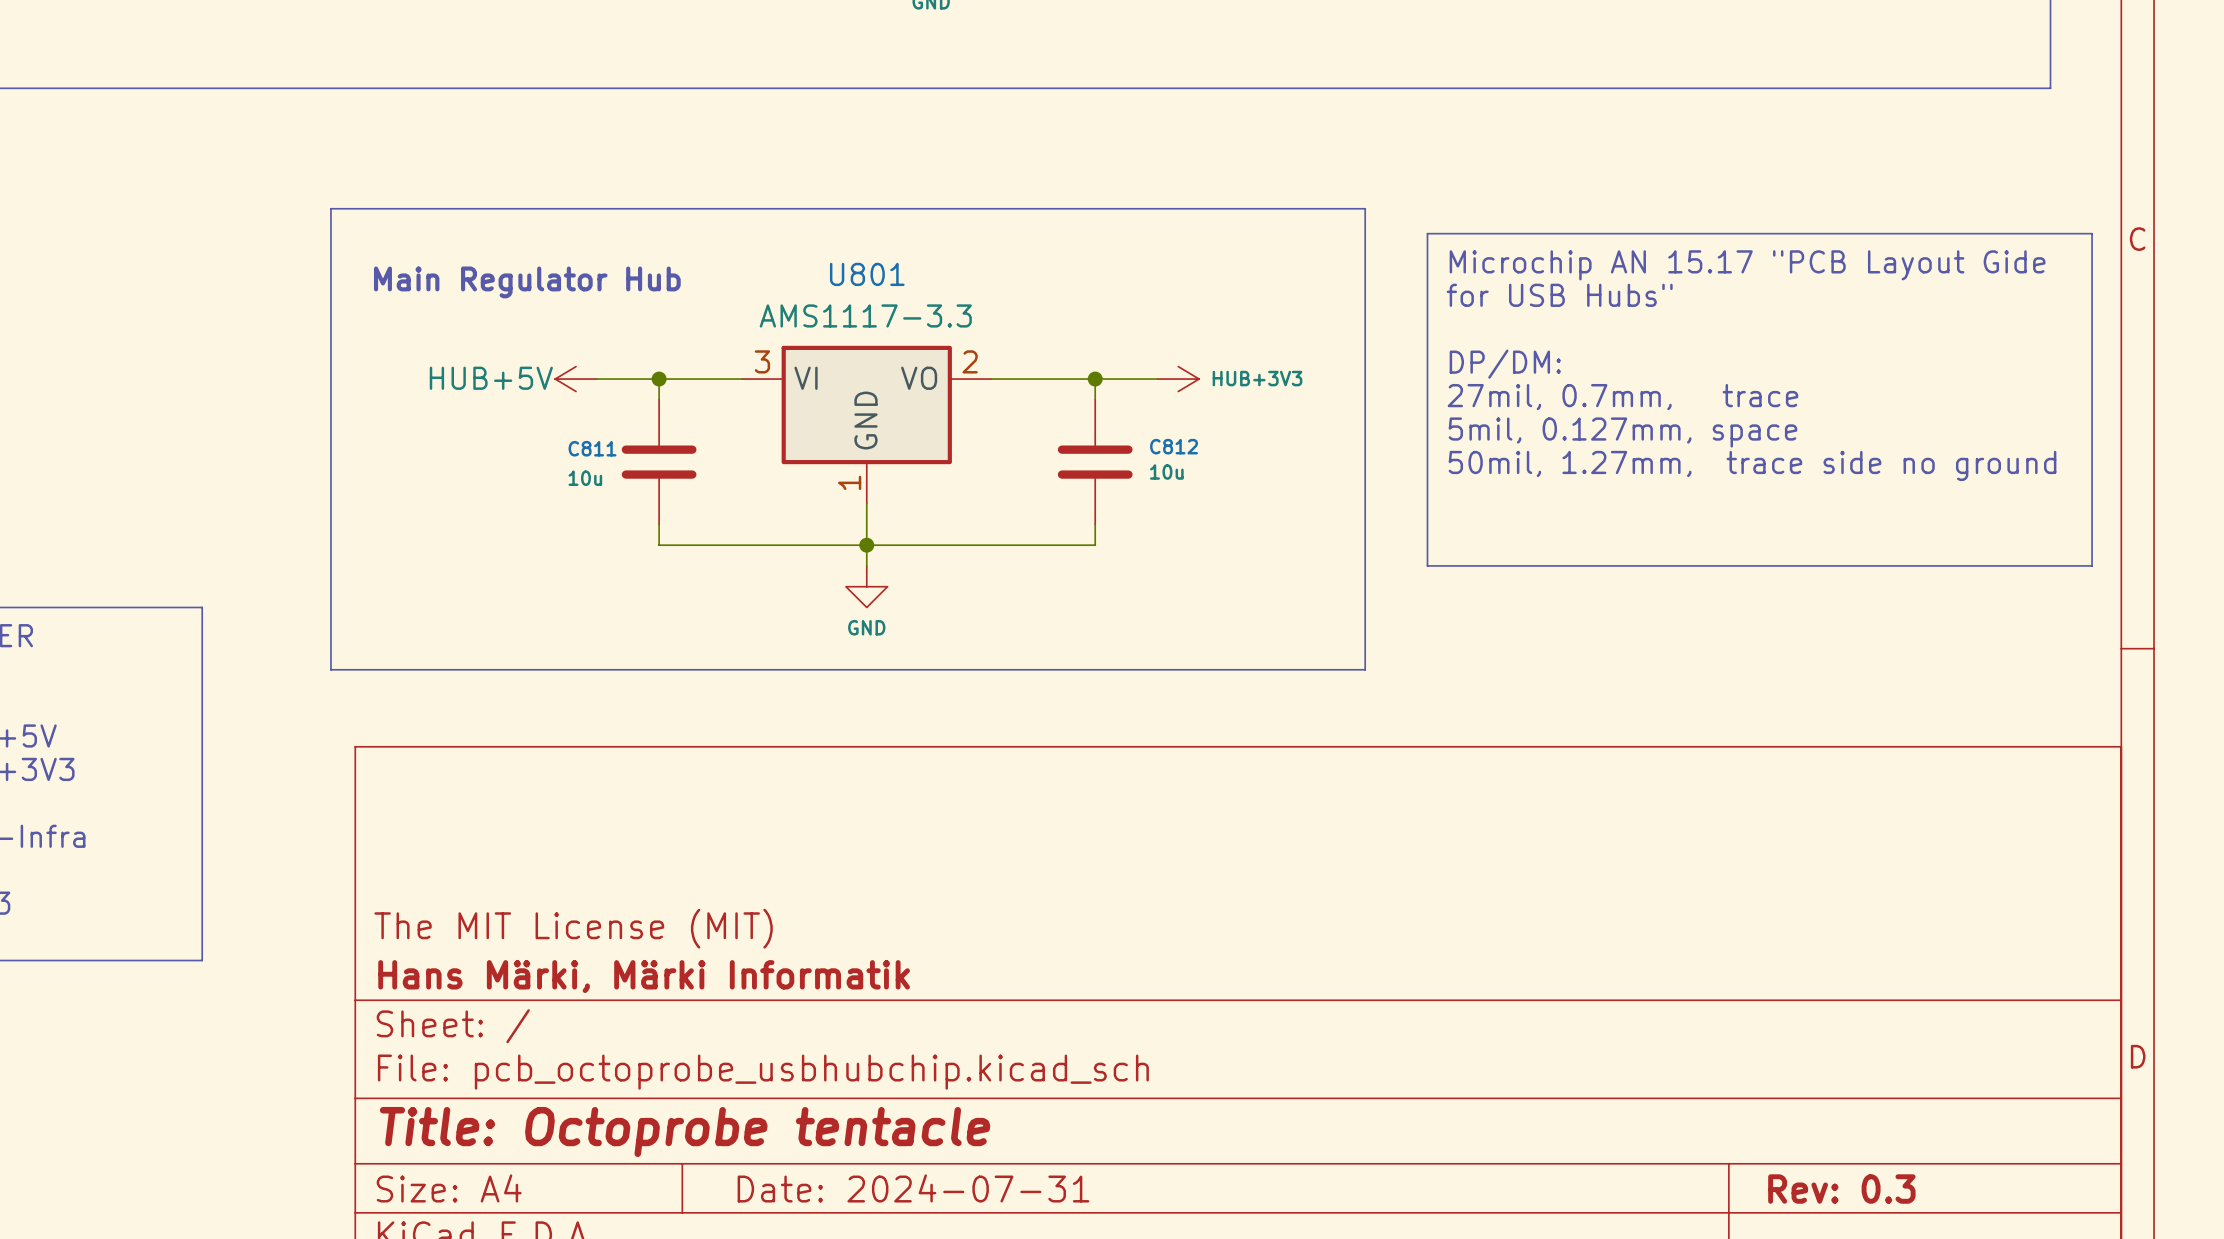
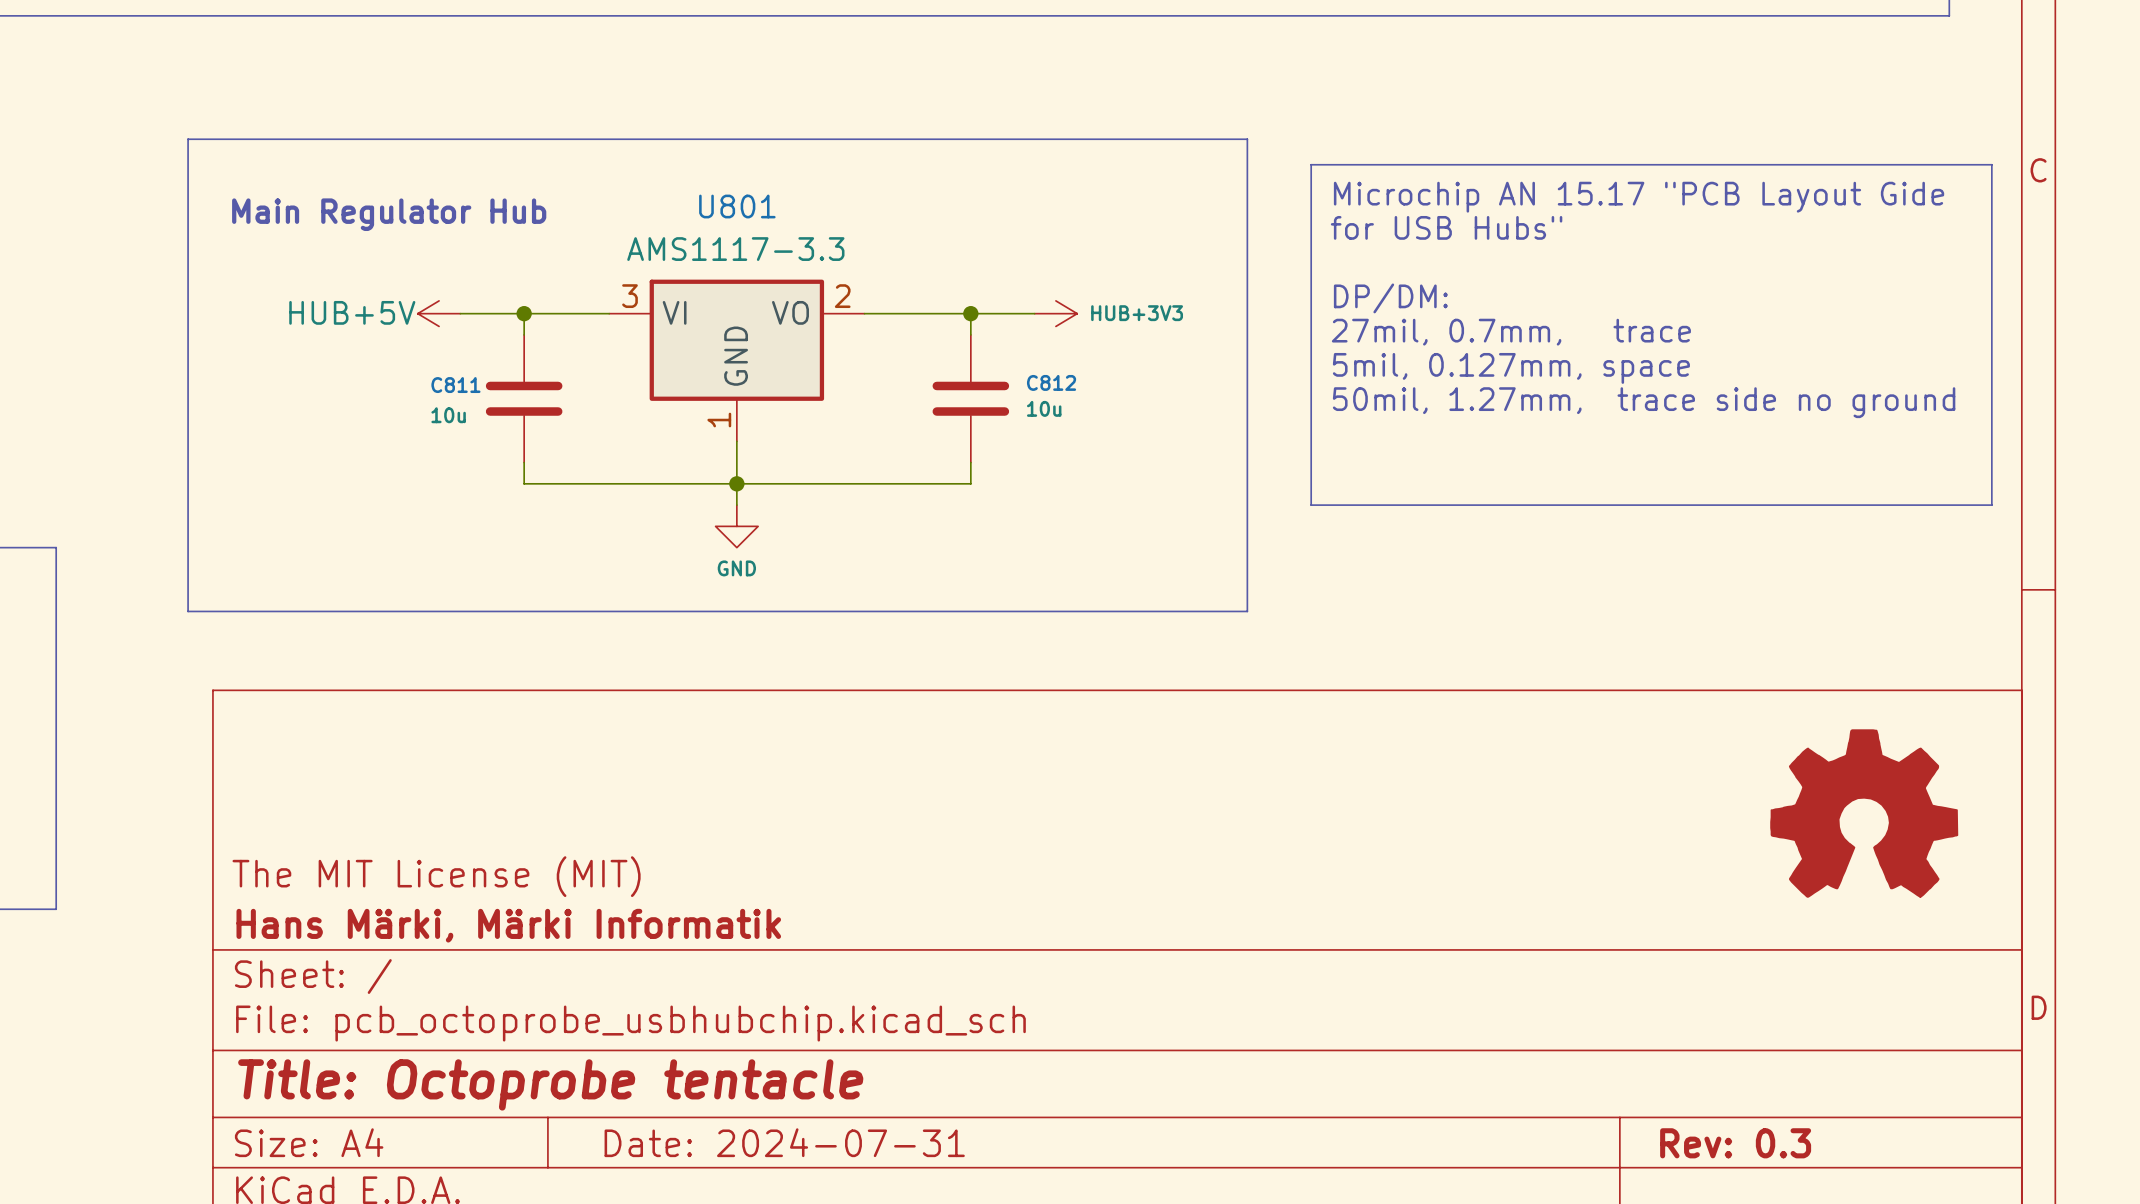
power symbol: none -> (1864, 813)

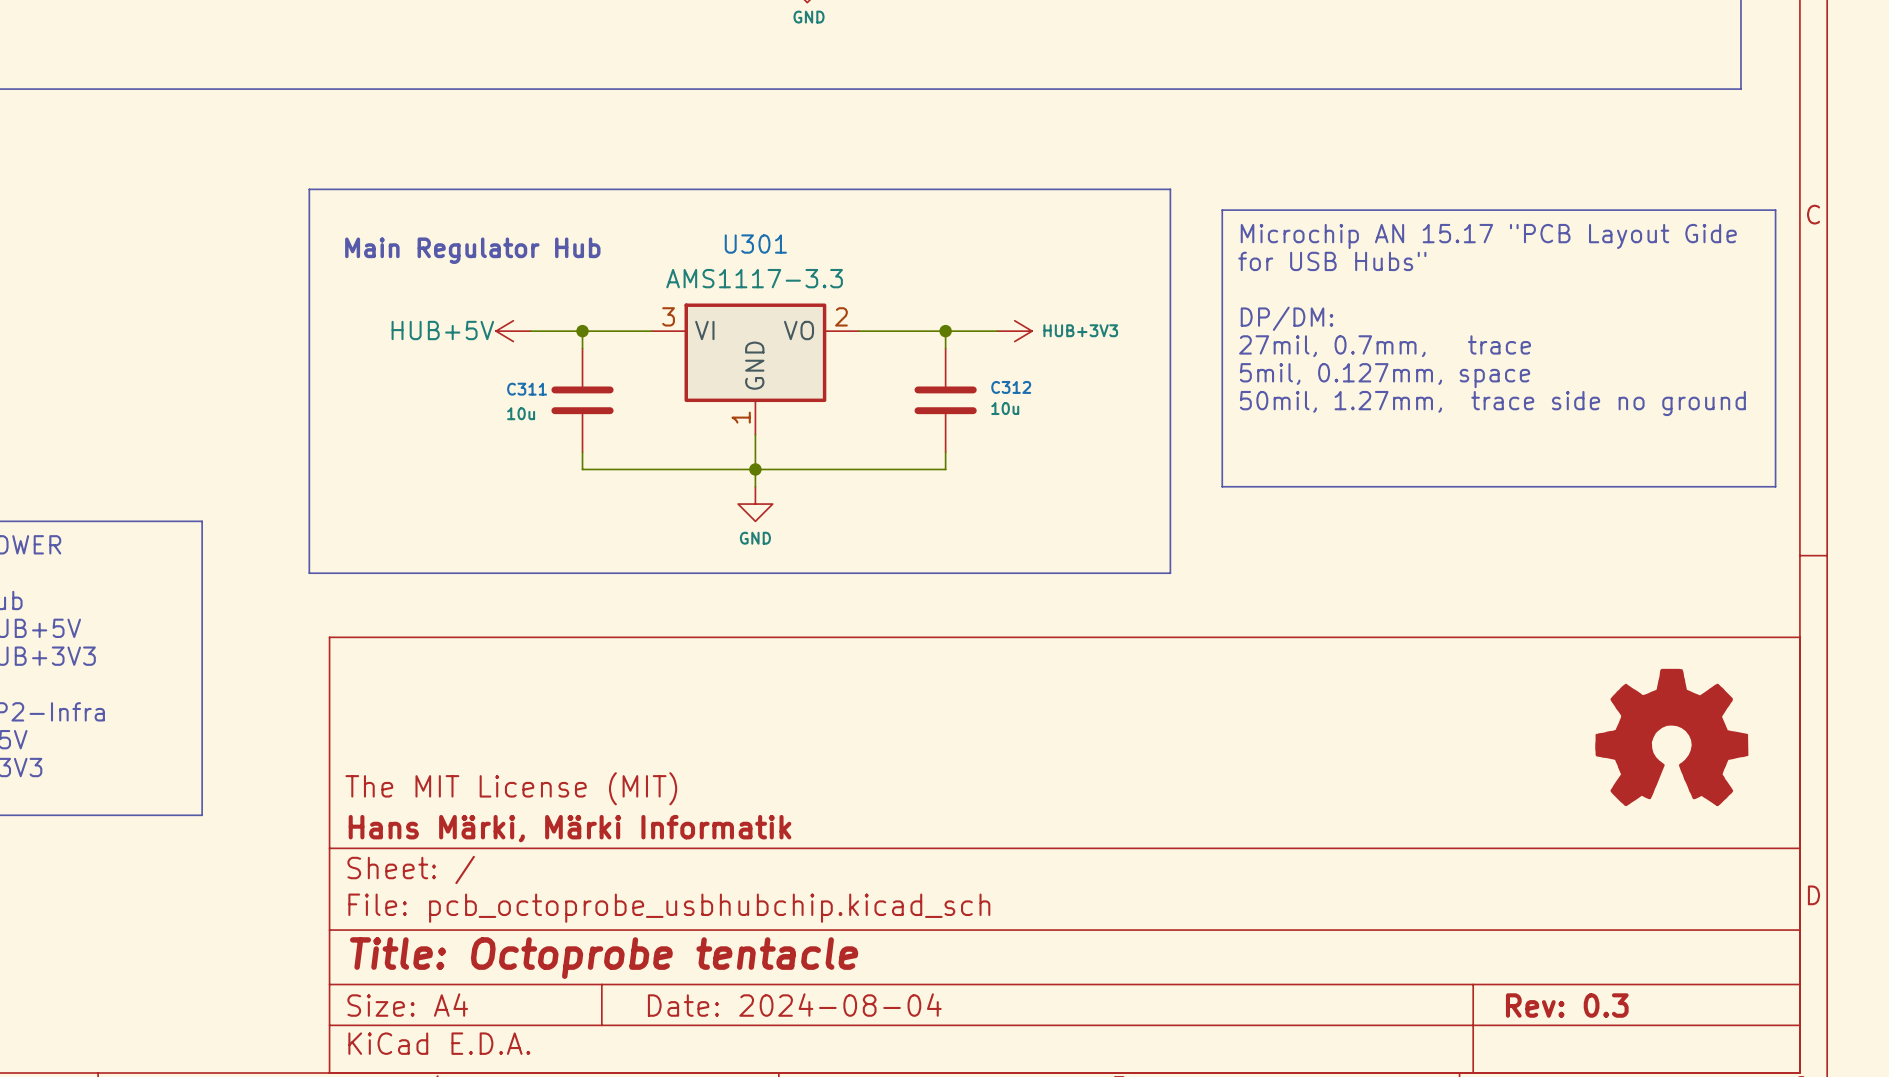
U801 name: U801 (737, 206) -> U301 (755, 244)
C812 name: C812 (1051, 382) -> C312 (1011, 387)
C811 name: C811 (455, 385) -> C311 (527, 389)
title block: Date: 2024-07-31 (784, 1142) -> Date: 2024-08-04 (794, 1005)

